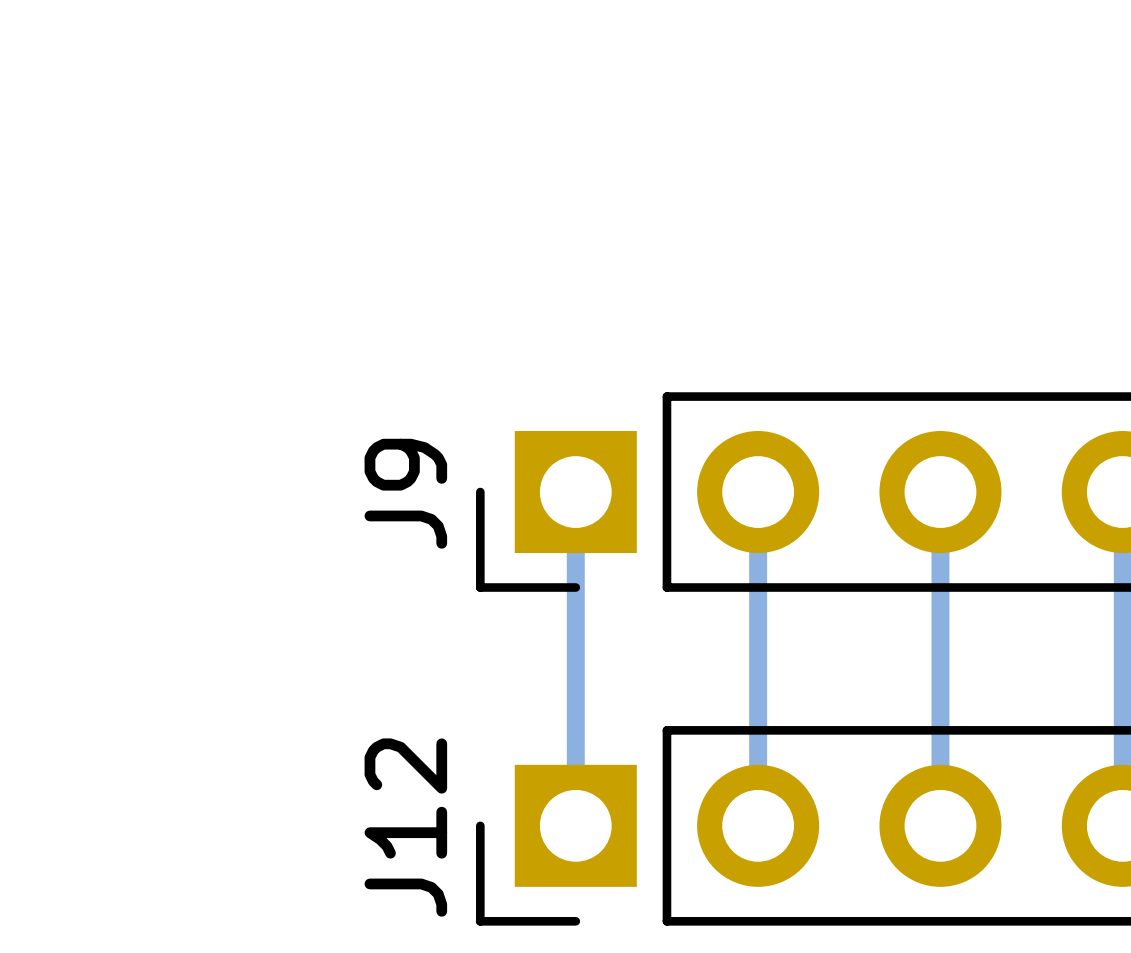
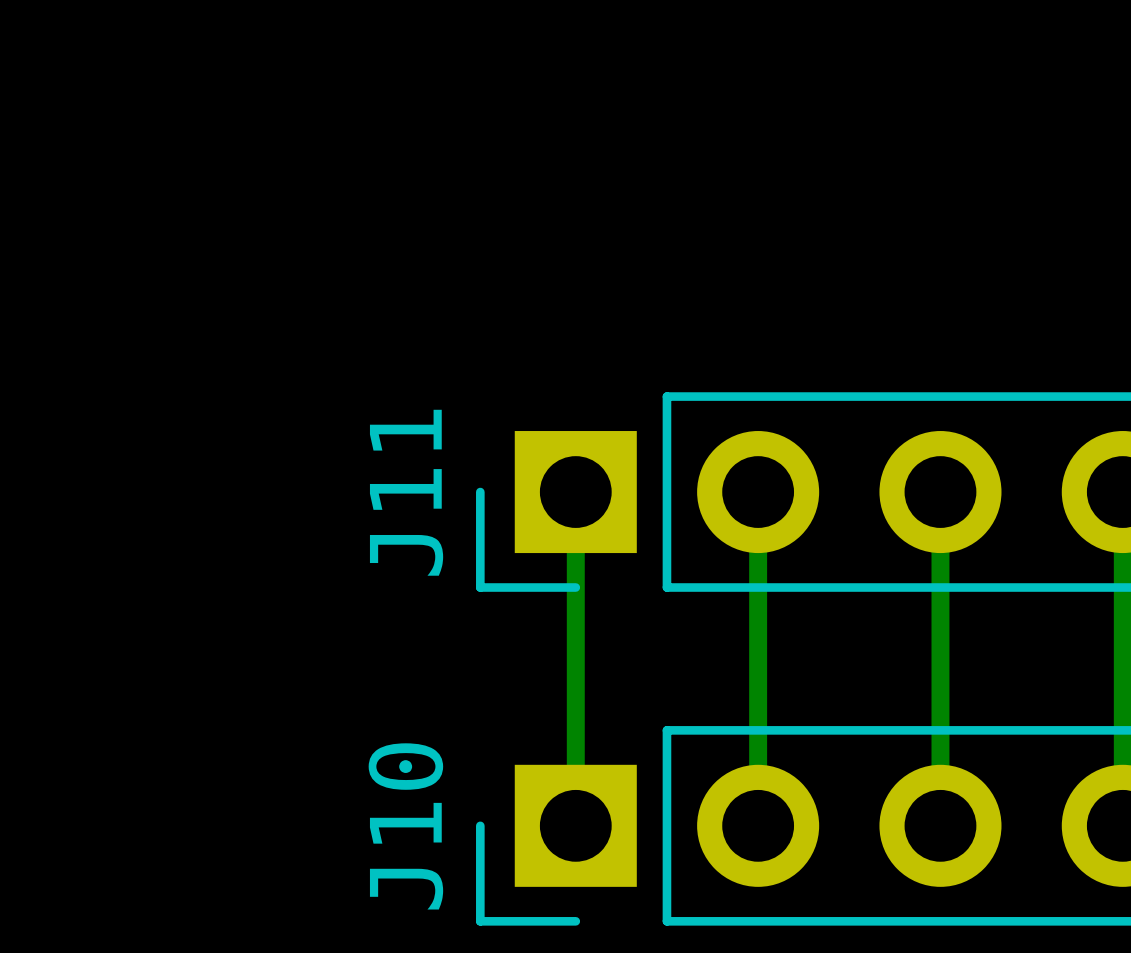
J9 name: J9 (405, 493) -> J11 (406, 492)
J12 name: J12 (405, 827) -> J10 (405, 826)

